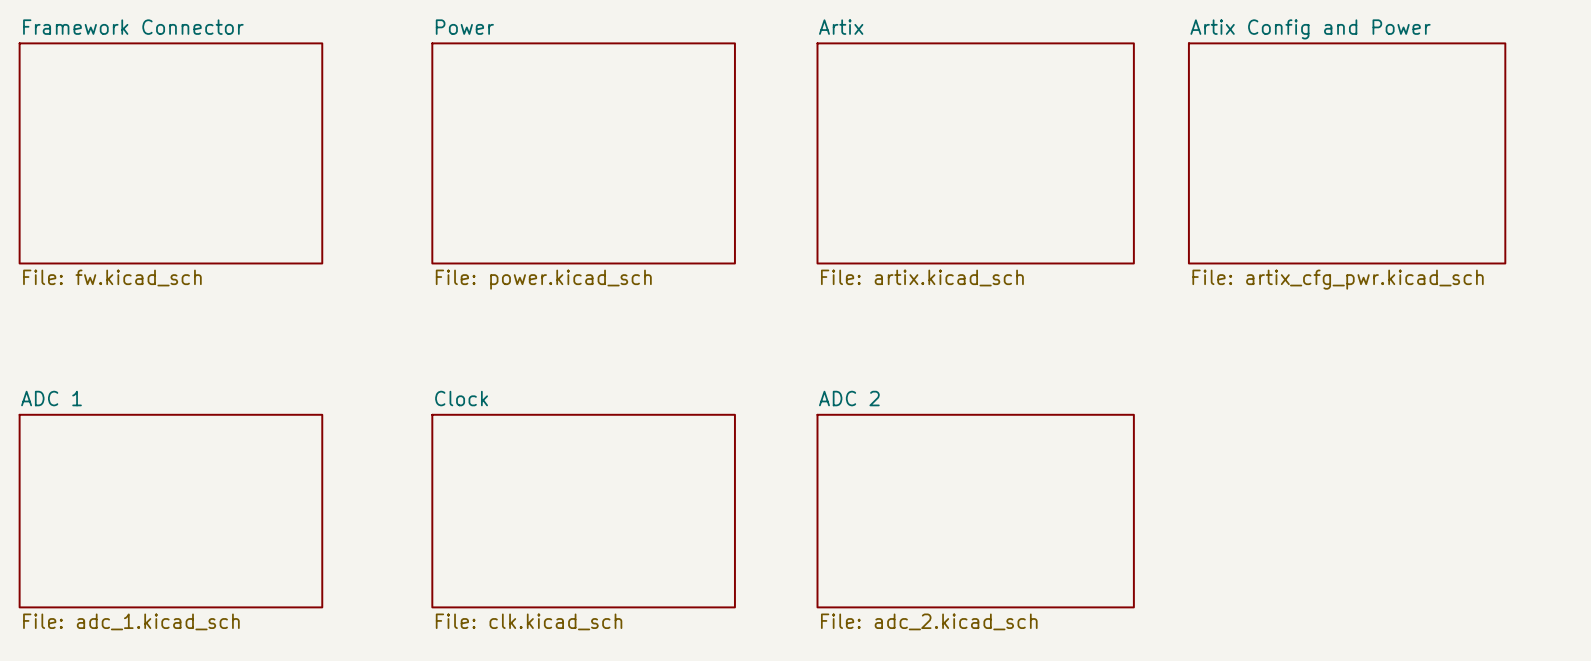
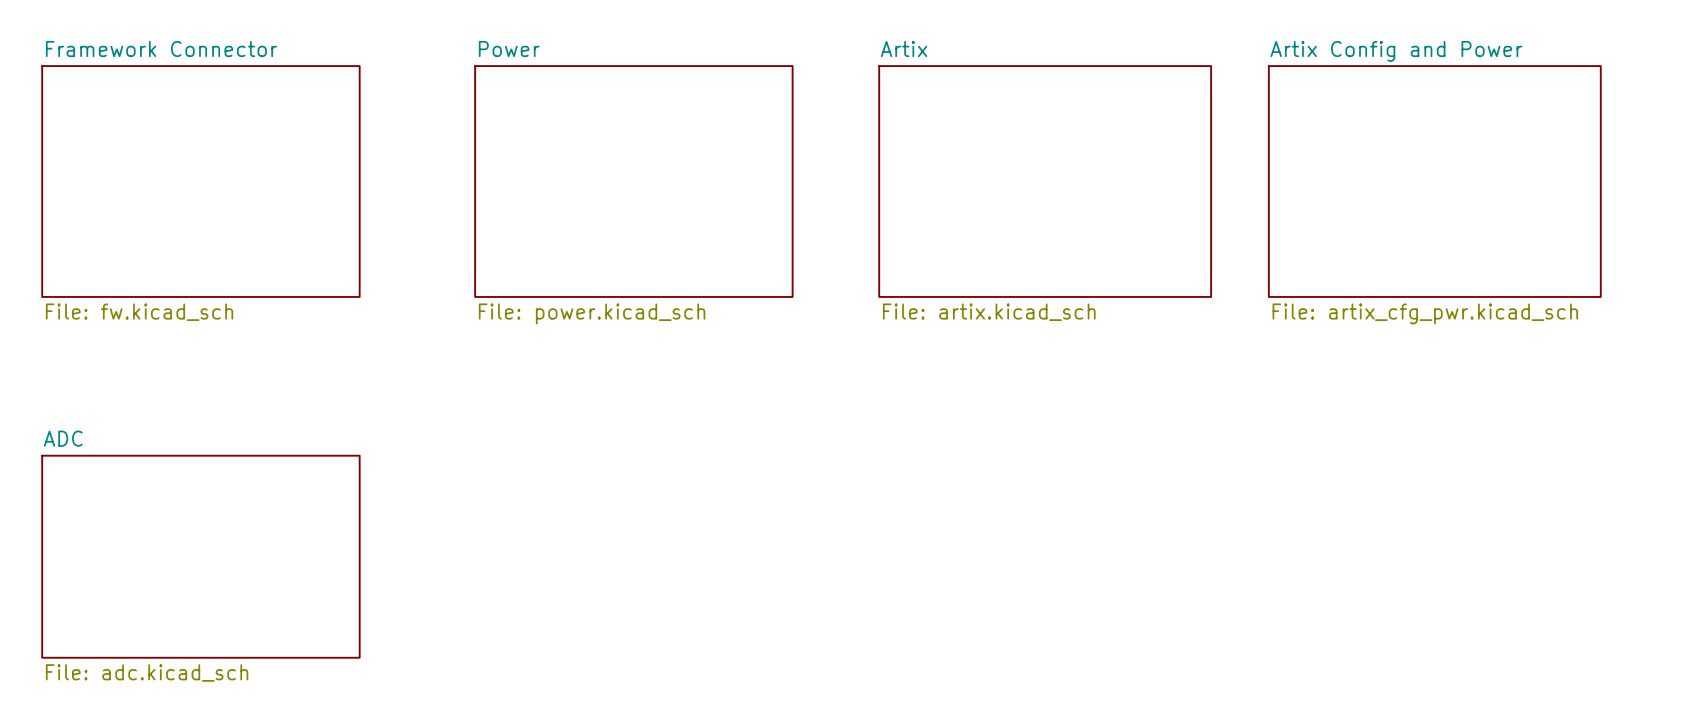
sheet ADC 1 name: ADC 1 (51, 398) -> ADC (63, 438)
sheet Clock: File: clk.kicad_sch (583, 511) -> none
sheet ADC 2: File: adc_2.kicad_sch (975, 511) -> none
sheet ADC 1 value: File: adc_1.kicad_sch (131, 621) -> File: adc.kicad_sch (147, 672)

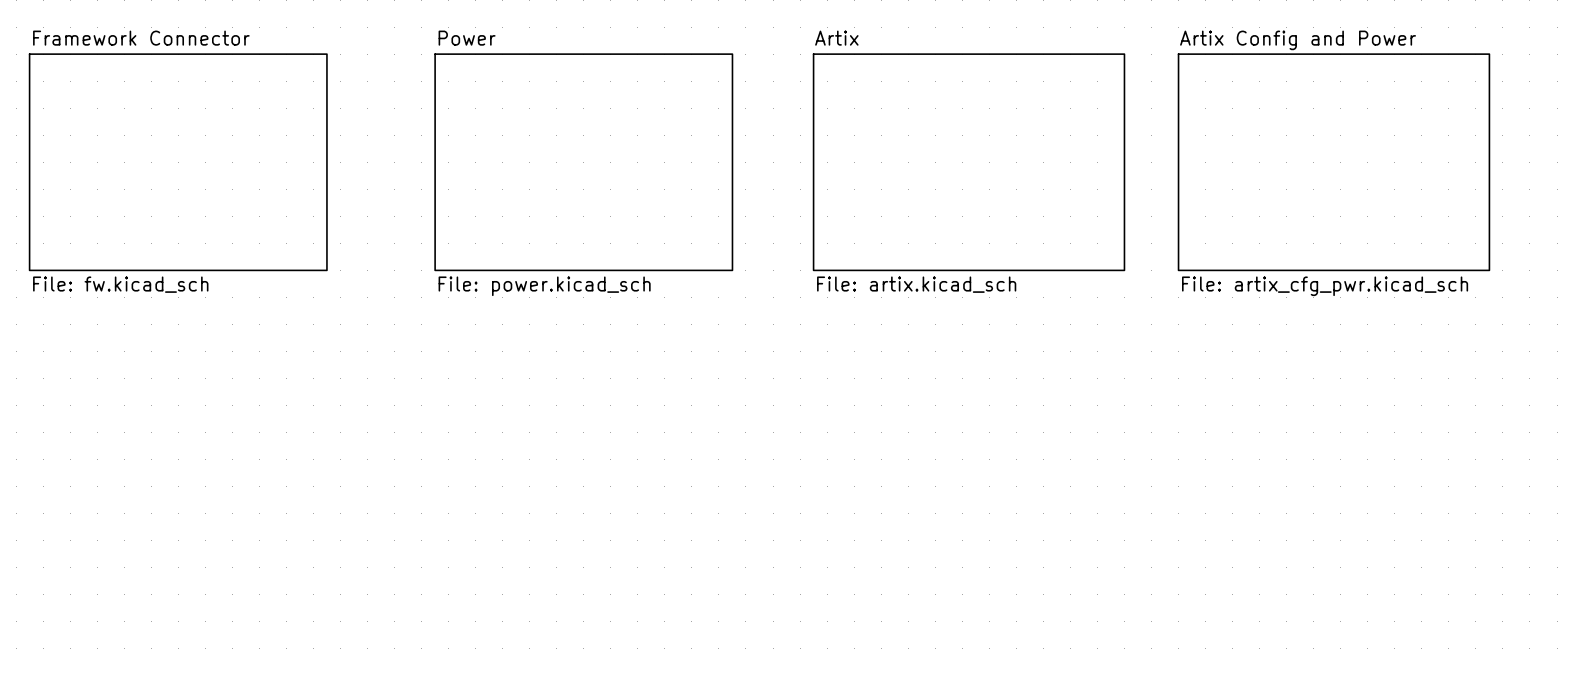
sheet ADC: File: adc.kicad_sch (200, 556) -> none

